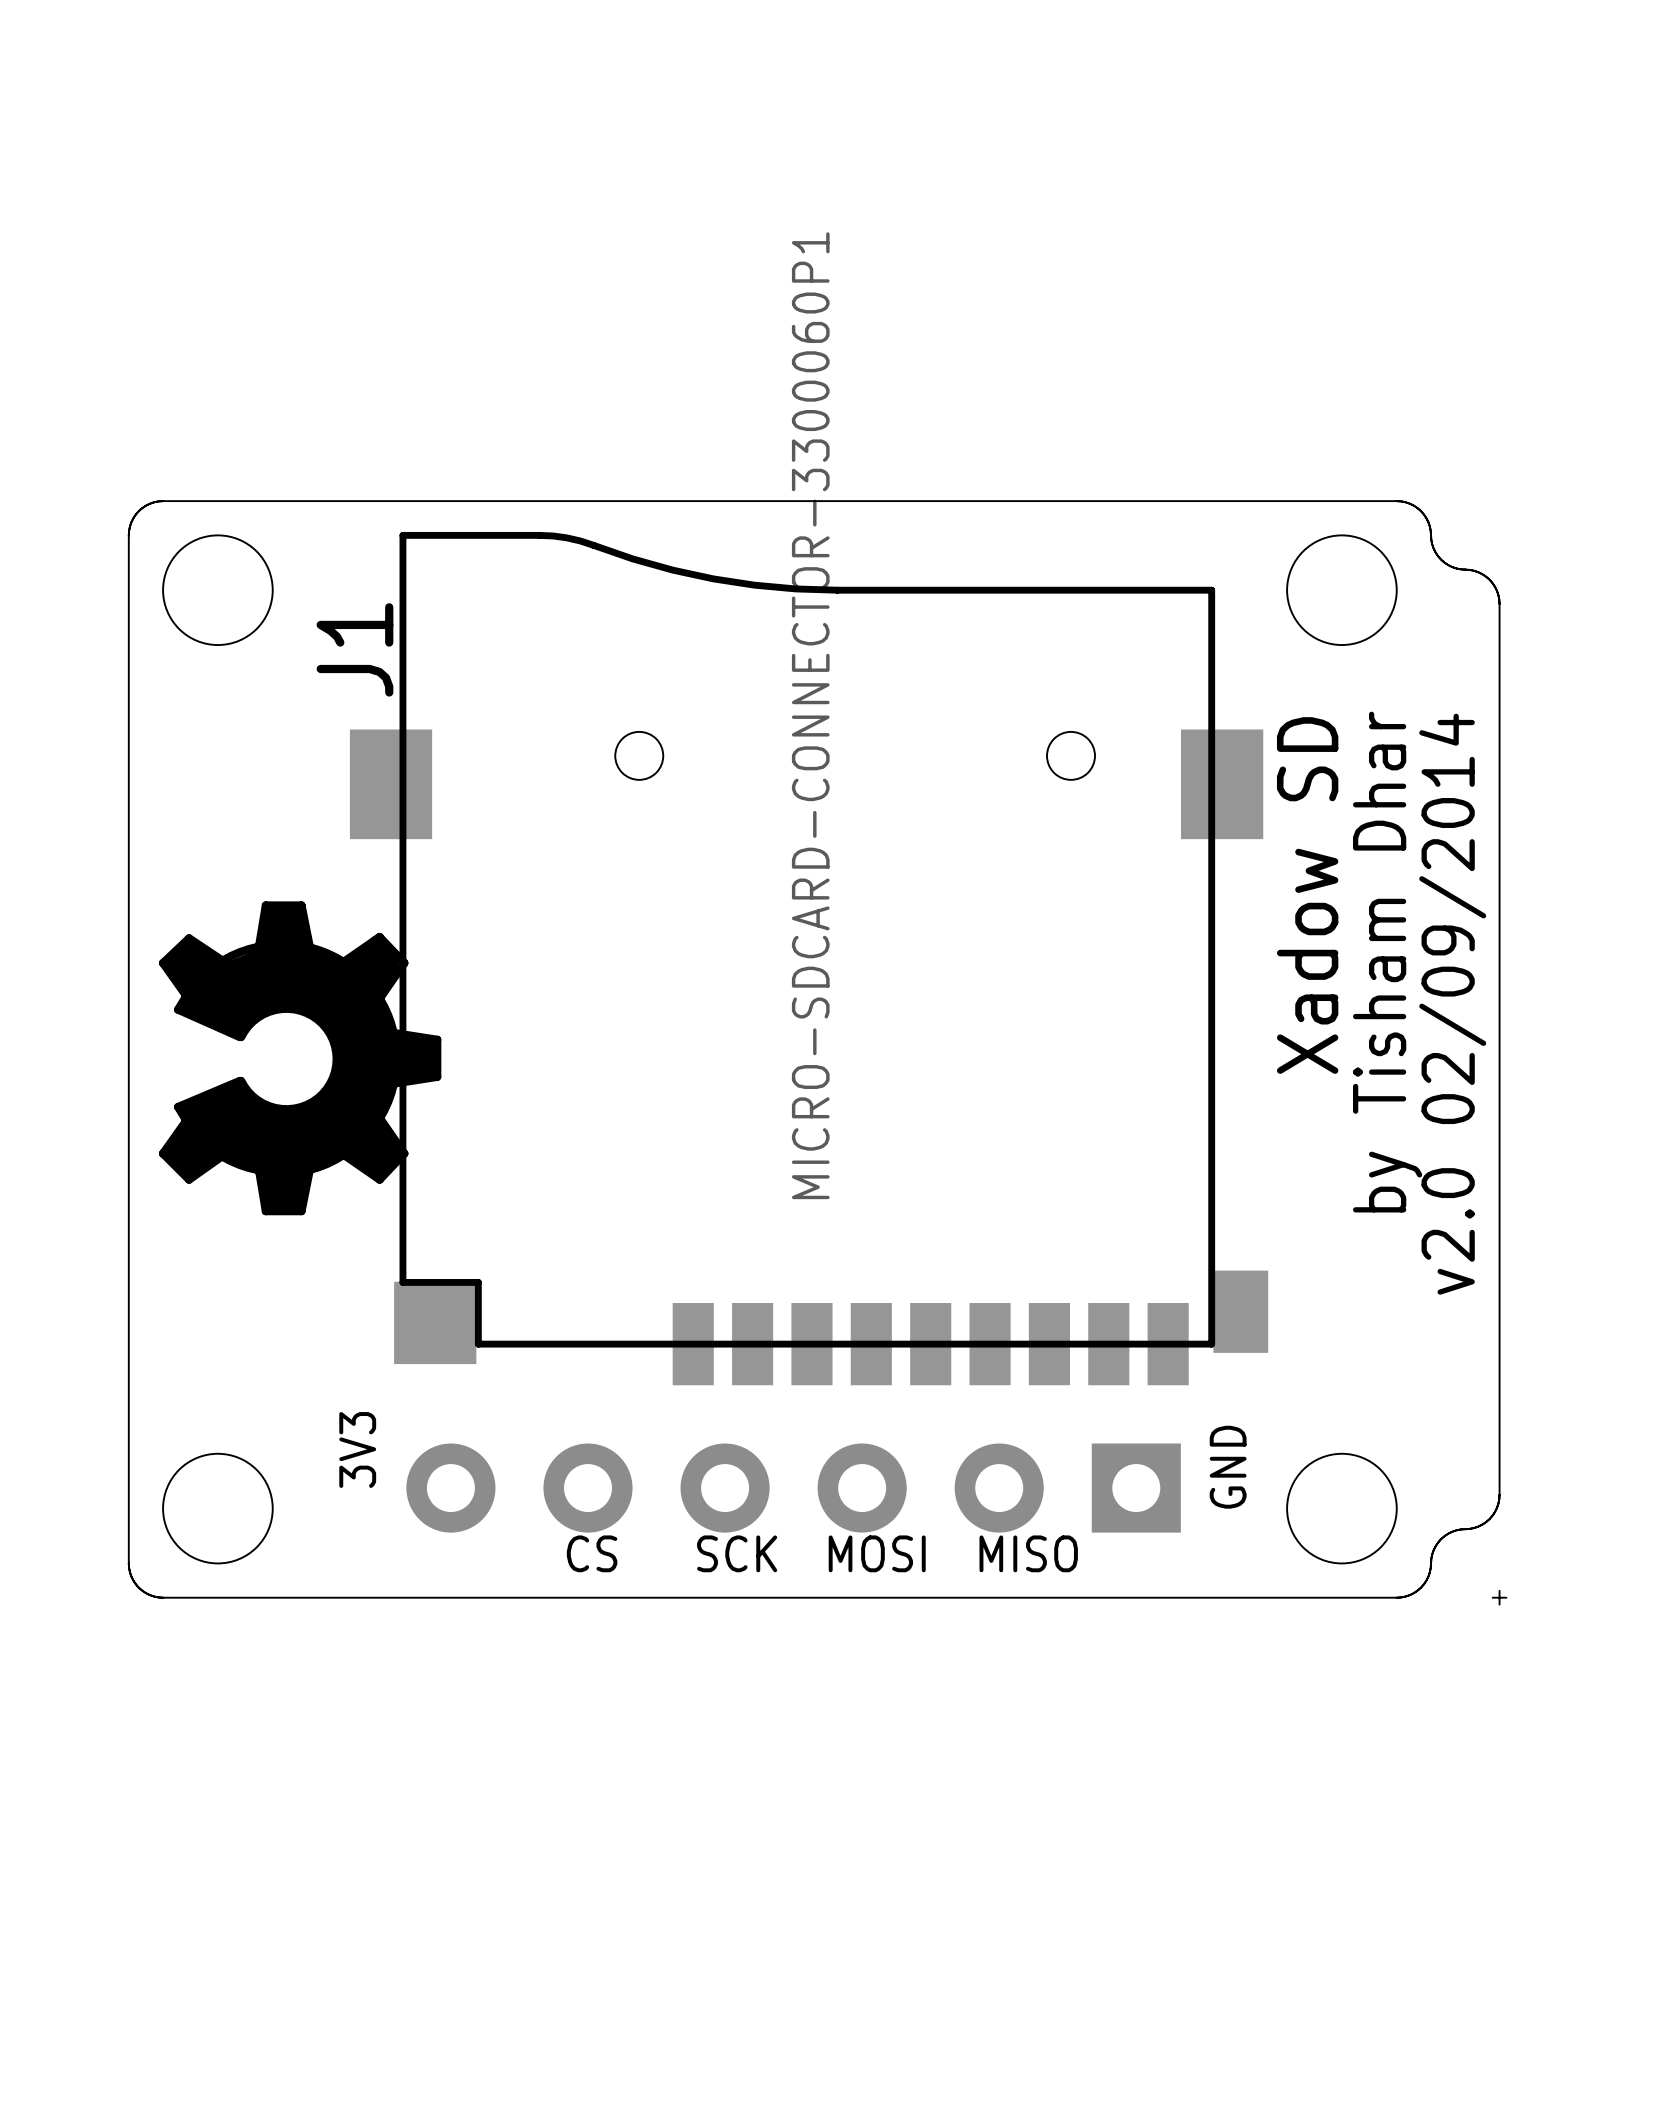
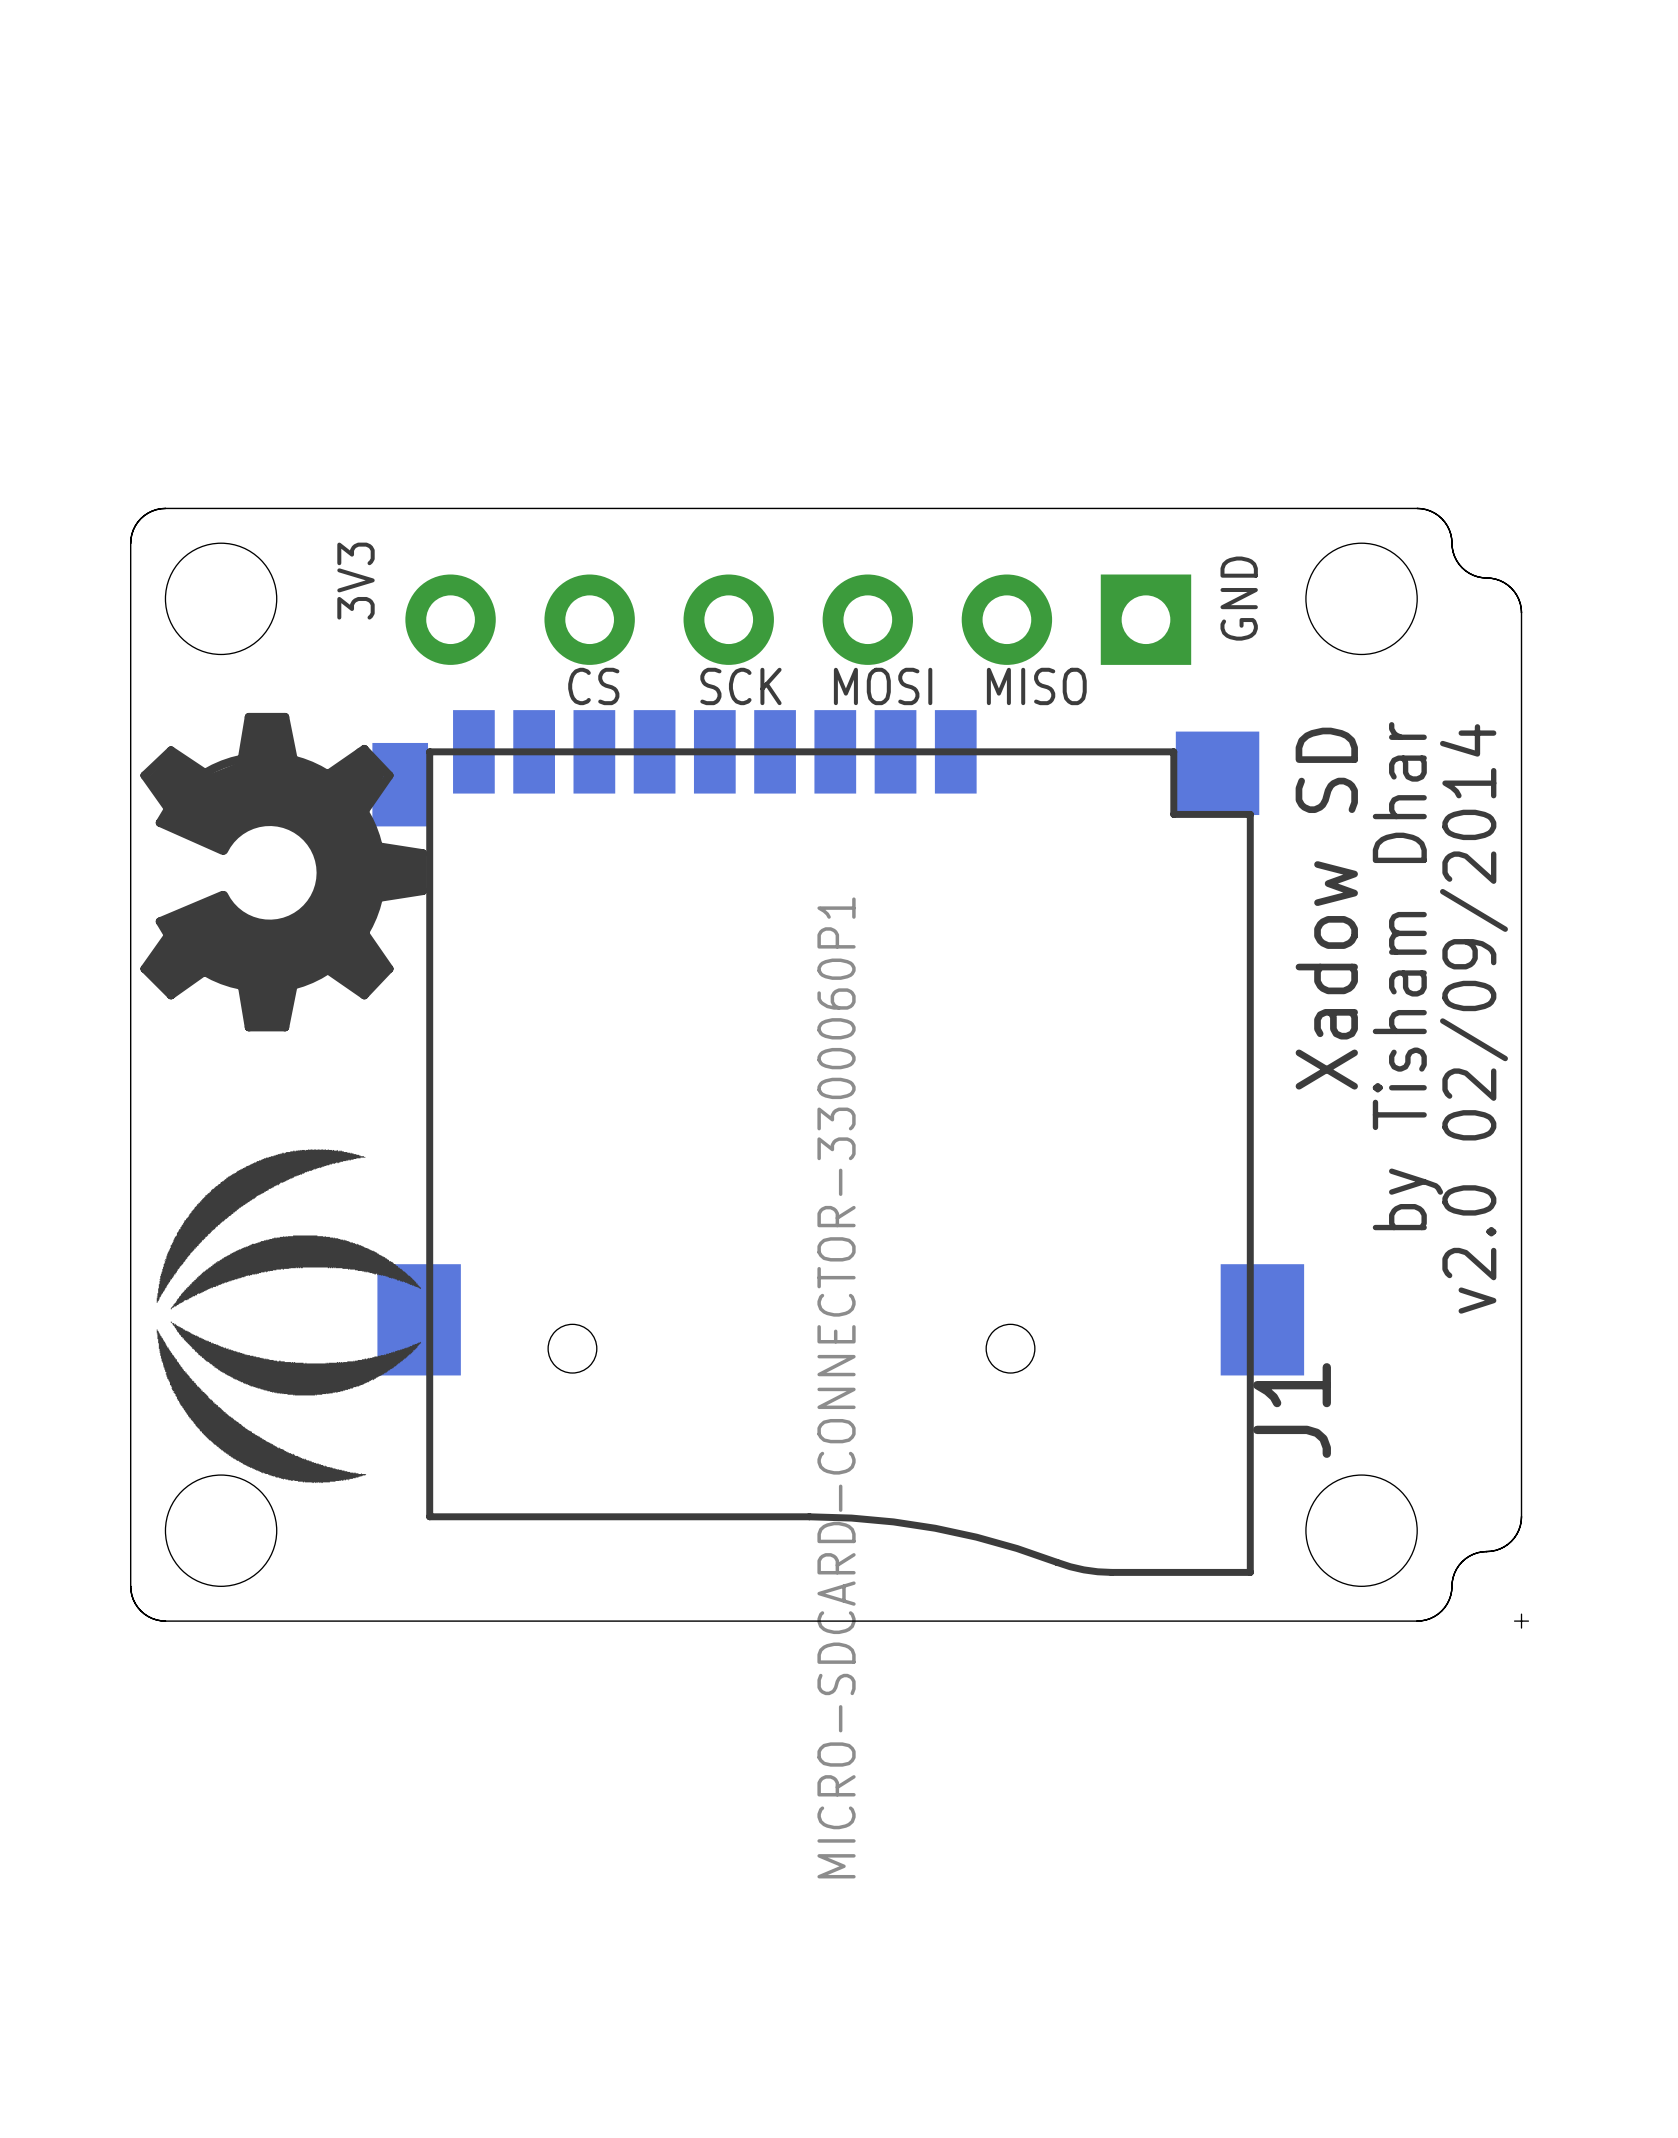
J1 rotation: 0° (809, 958) -> 180° (838, 1143)
drawing position: (300, 1058) -> (283, 872)
drawing: none -> [156, 1149, 422, 1484]
text position: 3V3 (357, 1449) -> 3V3 (355, 581)
text position: GND (1228, 1467) -> GND (1239, 598)
part position: (793, 1488) -> (798, 619)
text position: CS (592, 1553) -> CS (593, 686)
text position: SCK (737, 1553) -> SCK (740, 686)
text position: MOSI (877, 1553) -> MOSI (883, 686)
text position: MISO (1028, 1553) -> MISO (1036, 686)

